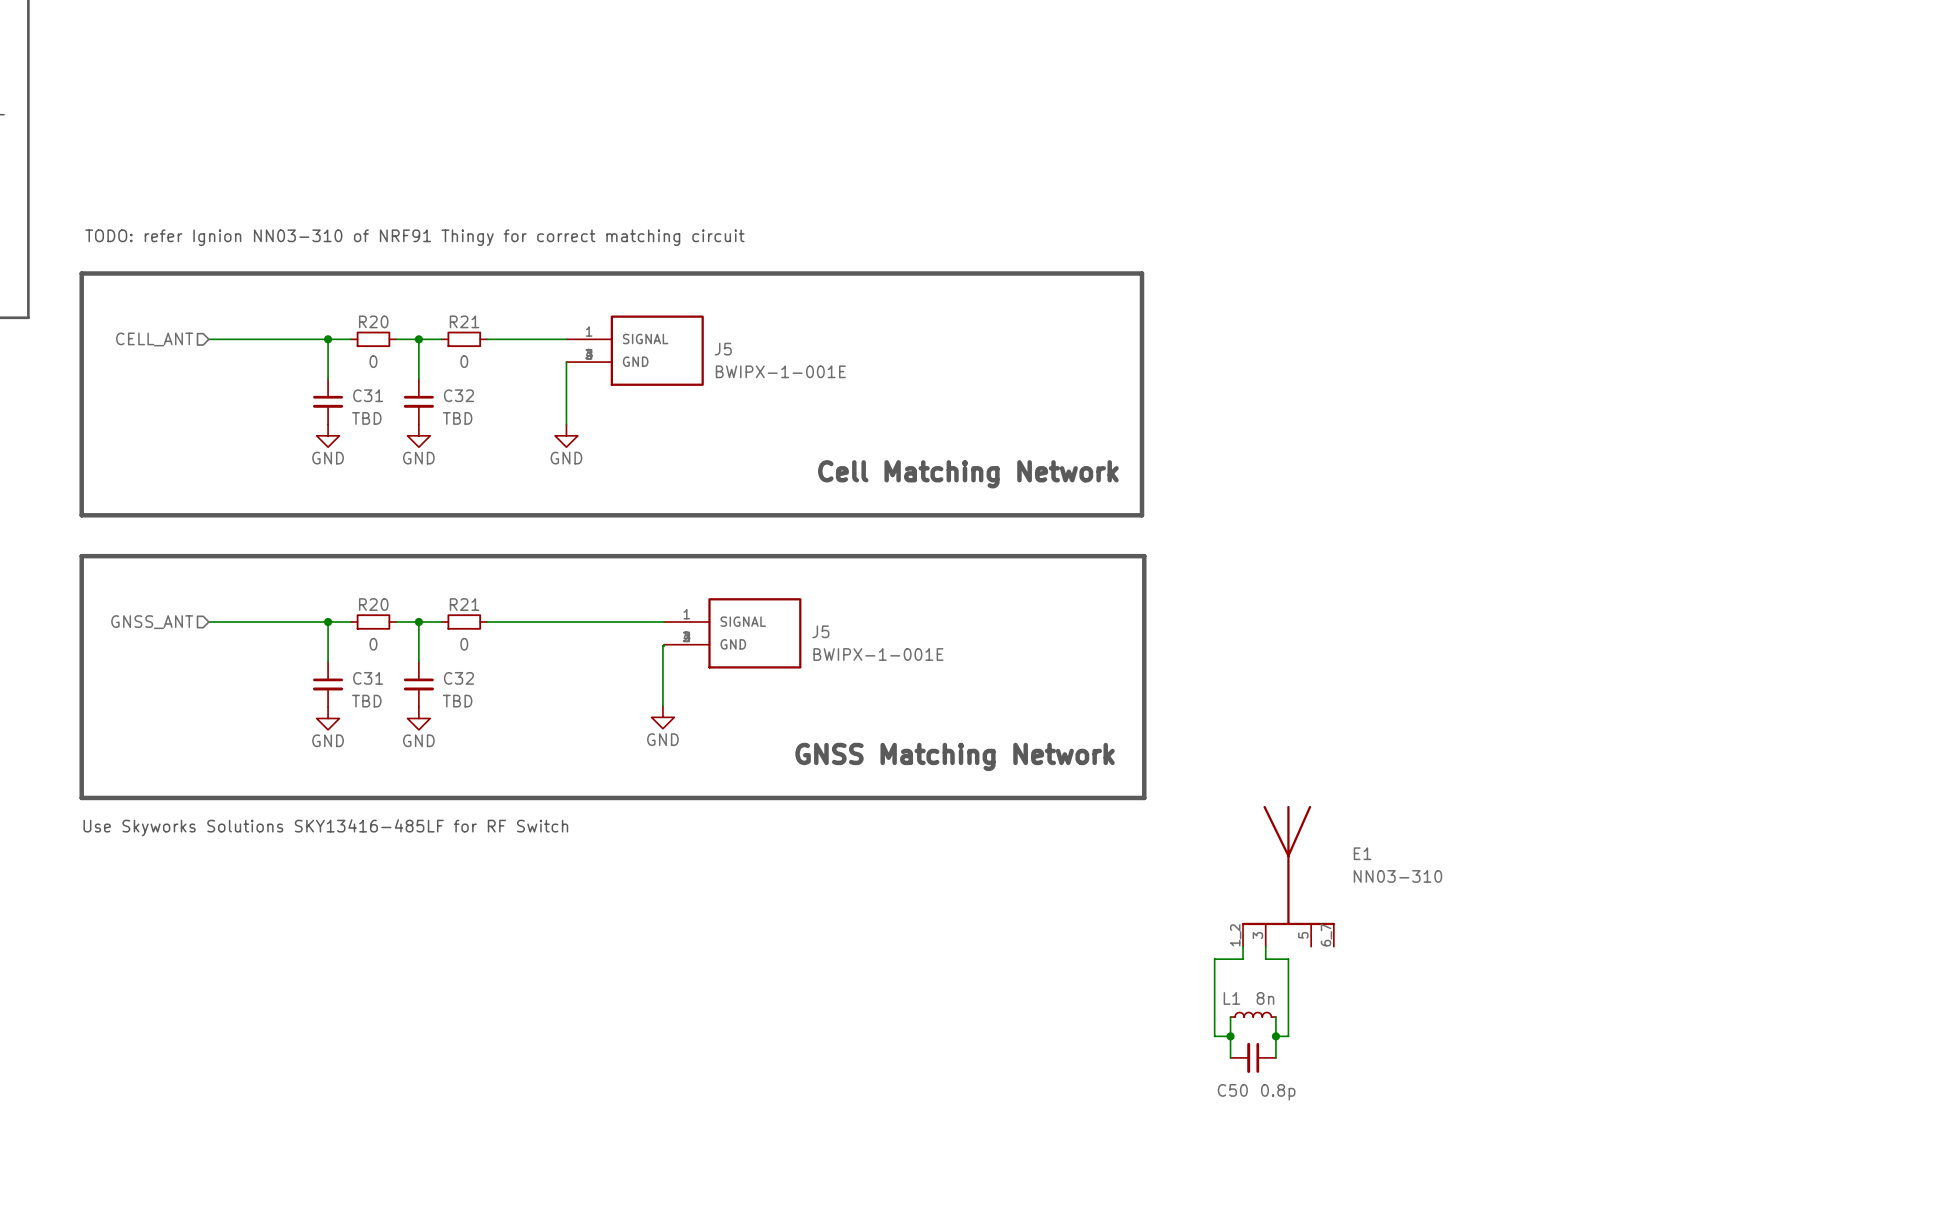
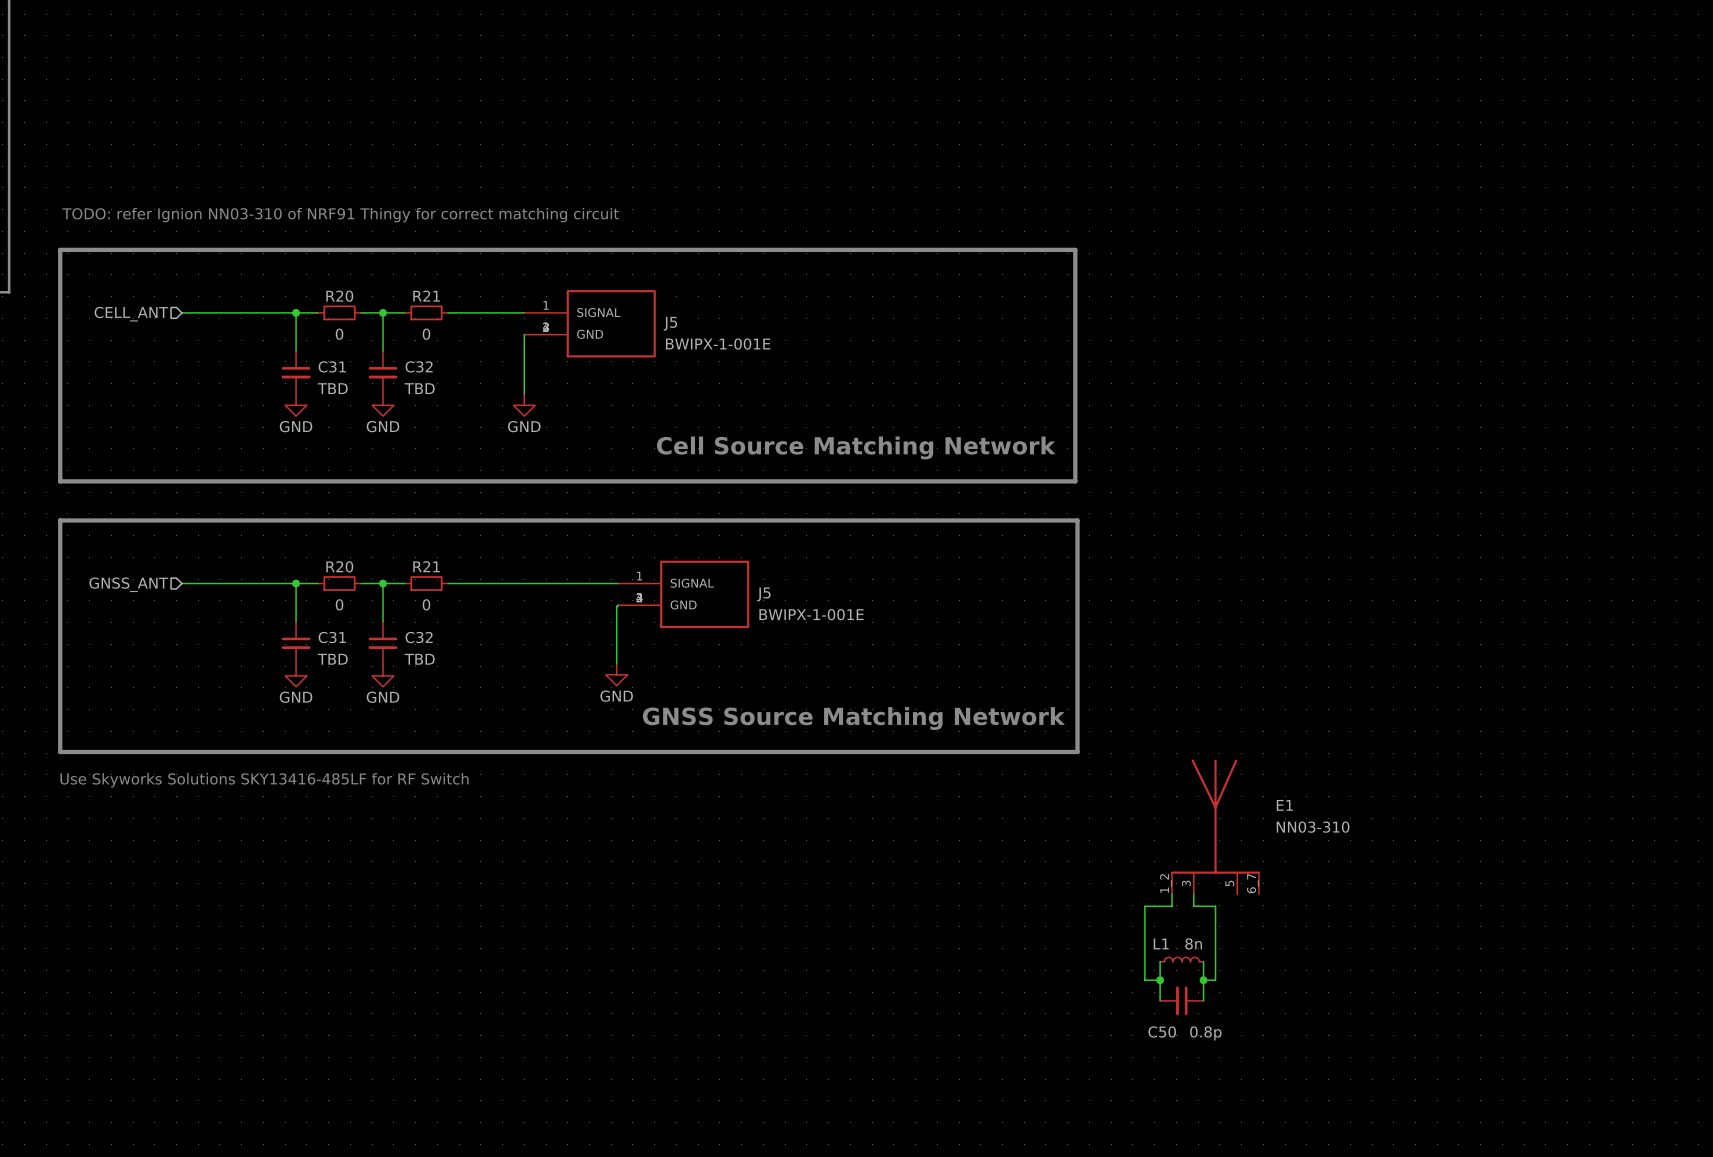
text: Cell Matching Network (968, 474) -> Cell Source Matching Network (856, 447)
text: GNSS Matching Network (955, 756) -> GNSS Source Matching Network (853, 718)

